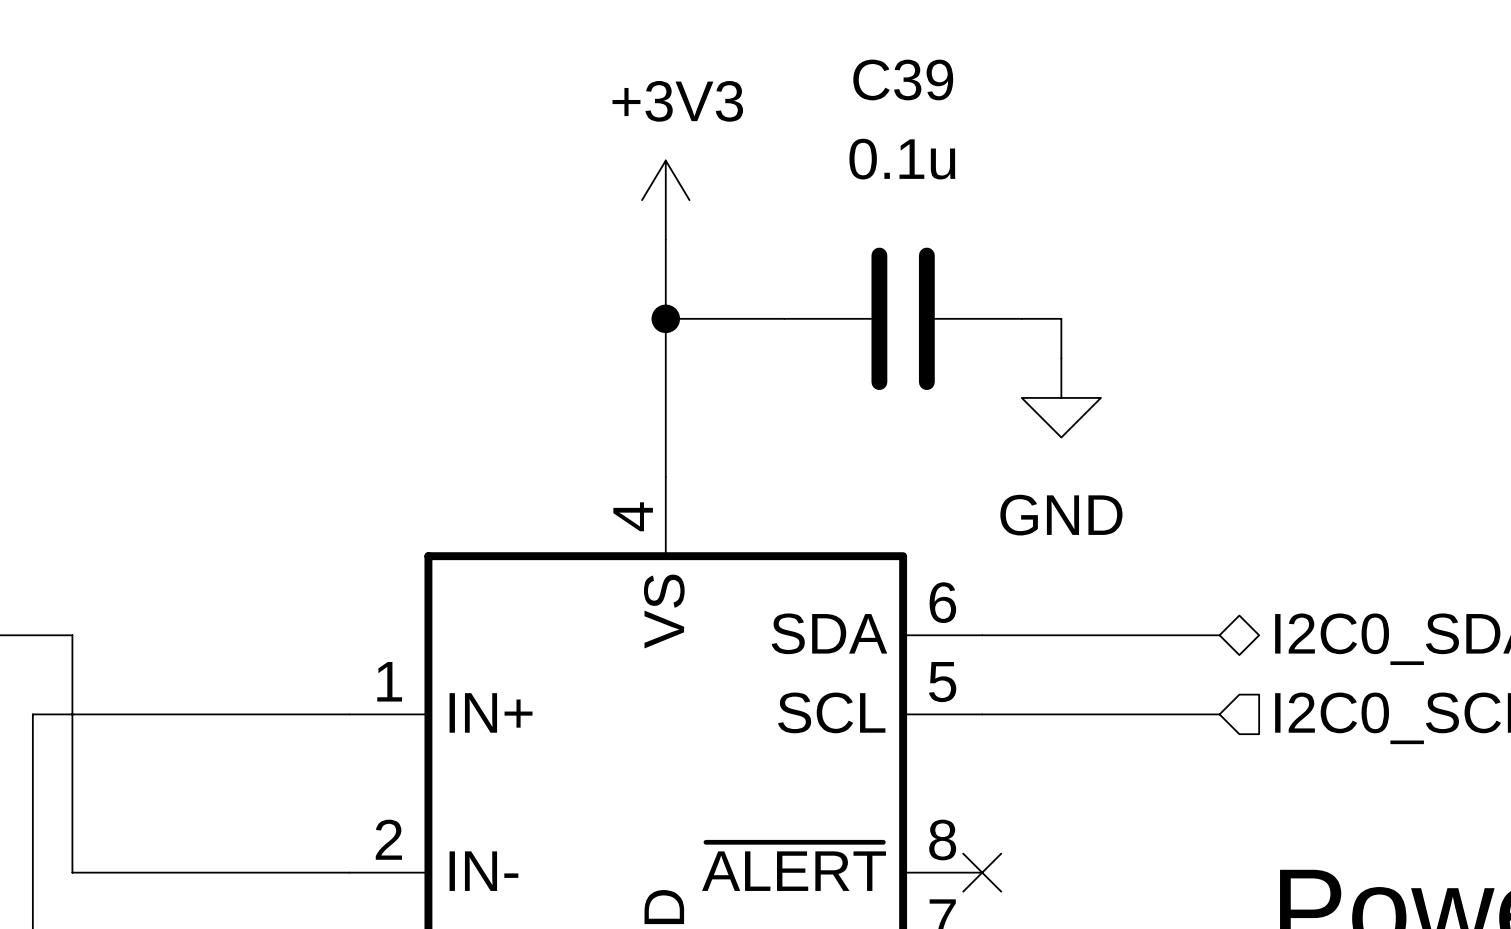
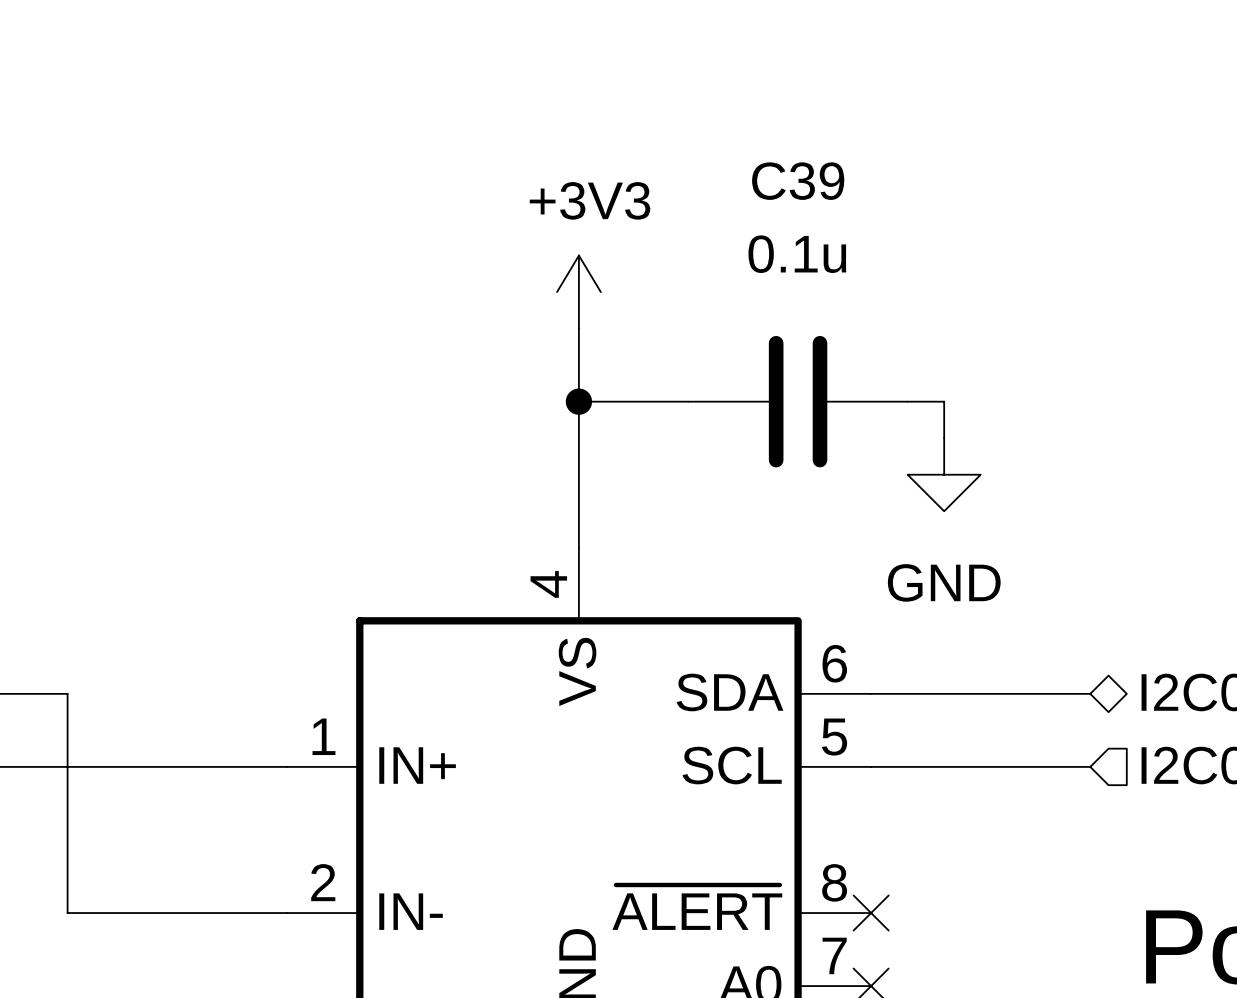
wire: (72, 635) (72, 872) (111, 872) -> (31, 693) (67, 693) (67, 913)

